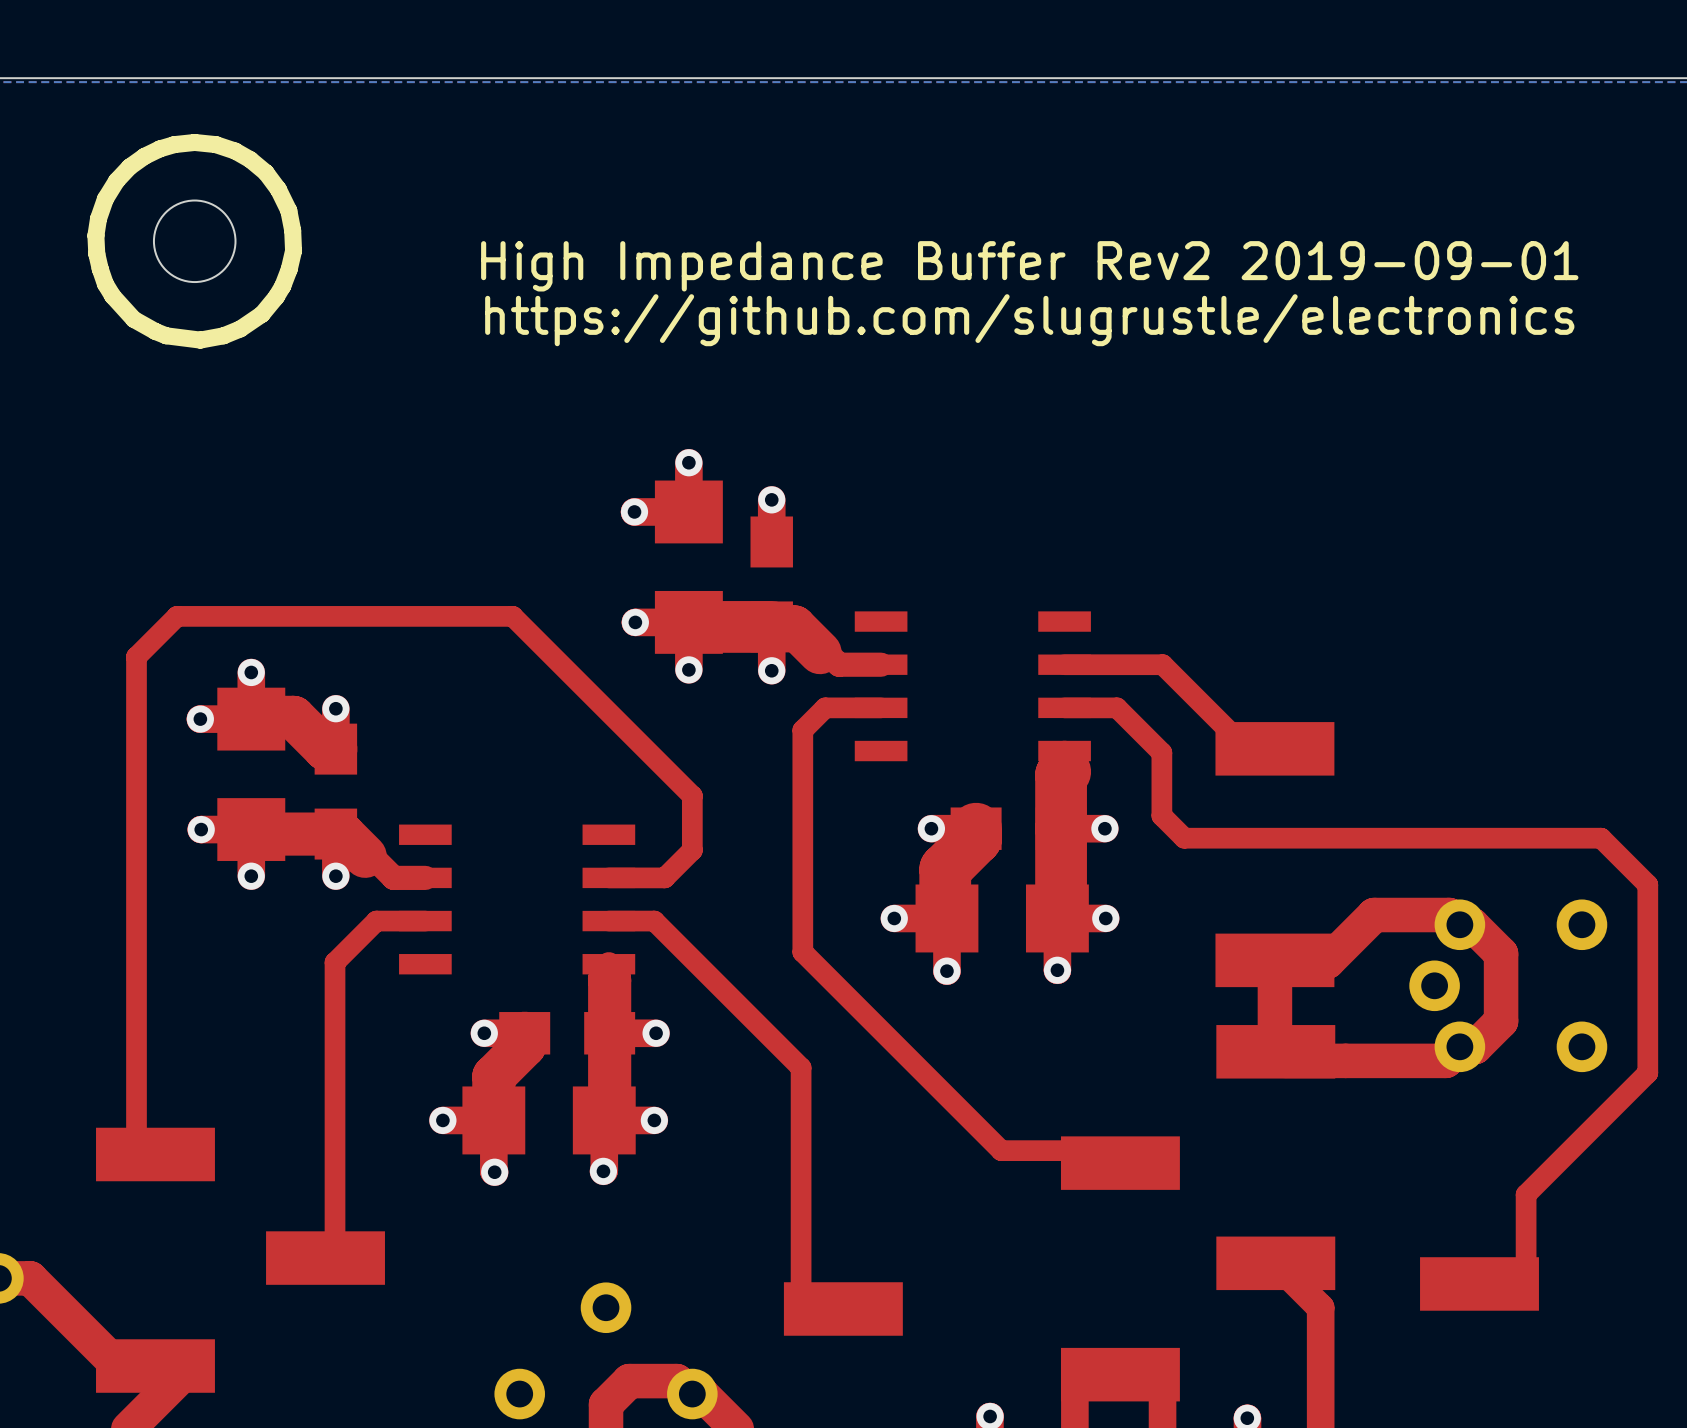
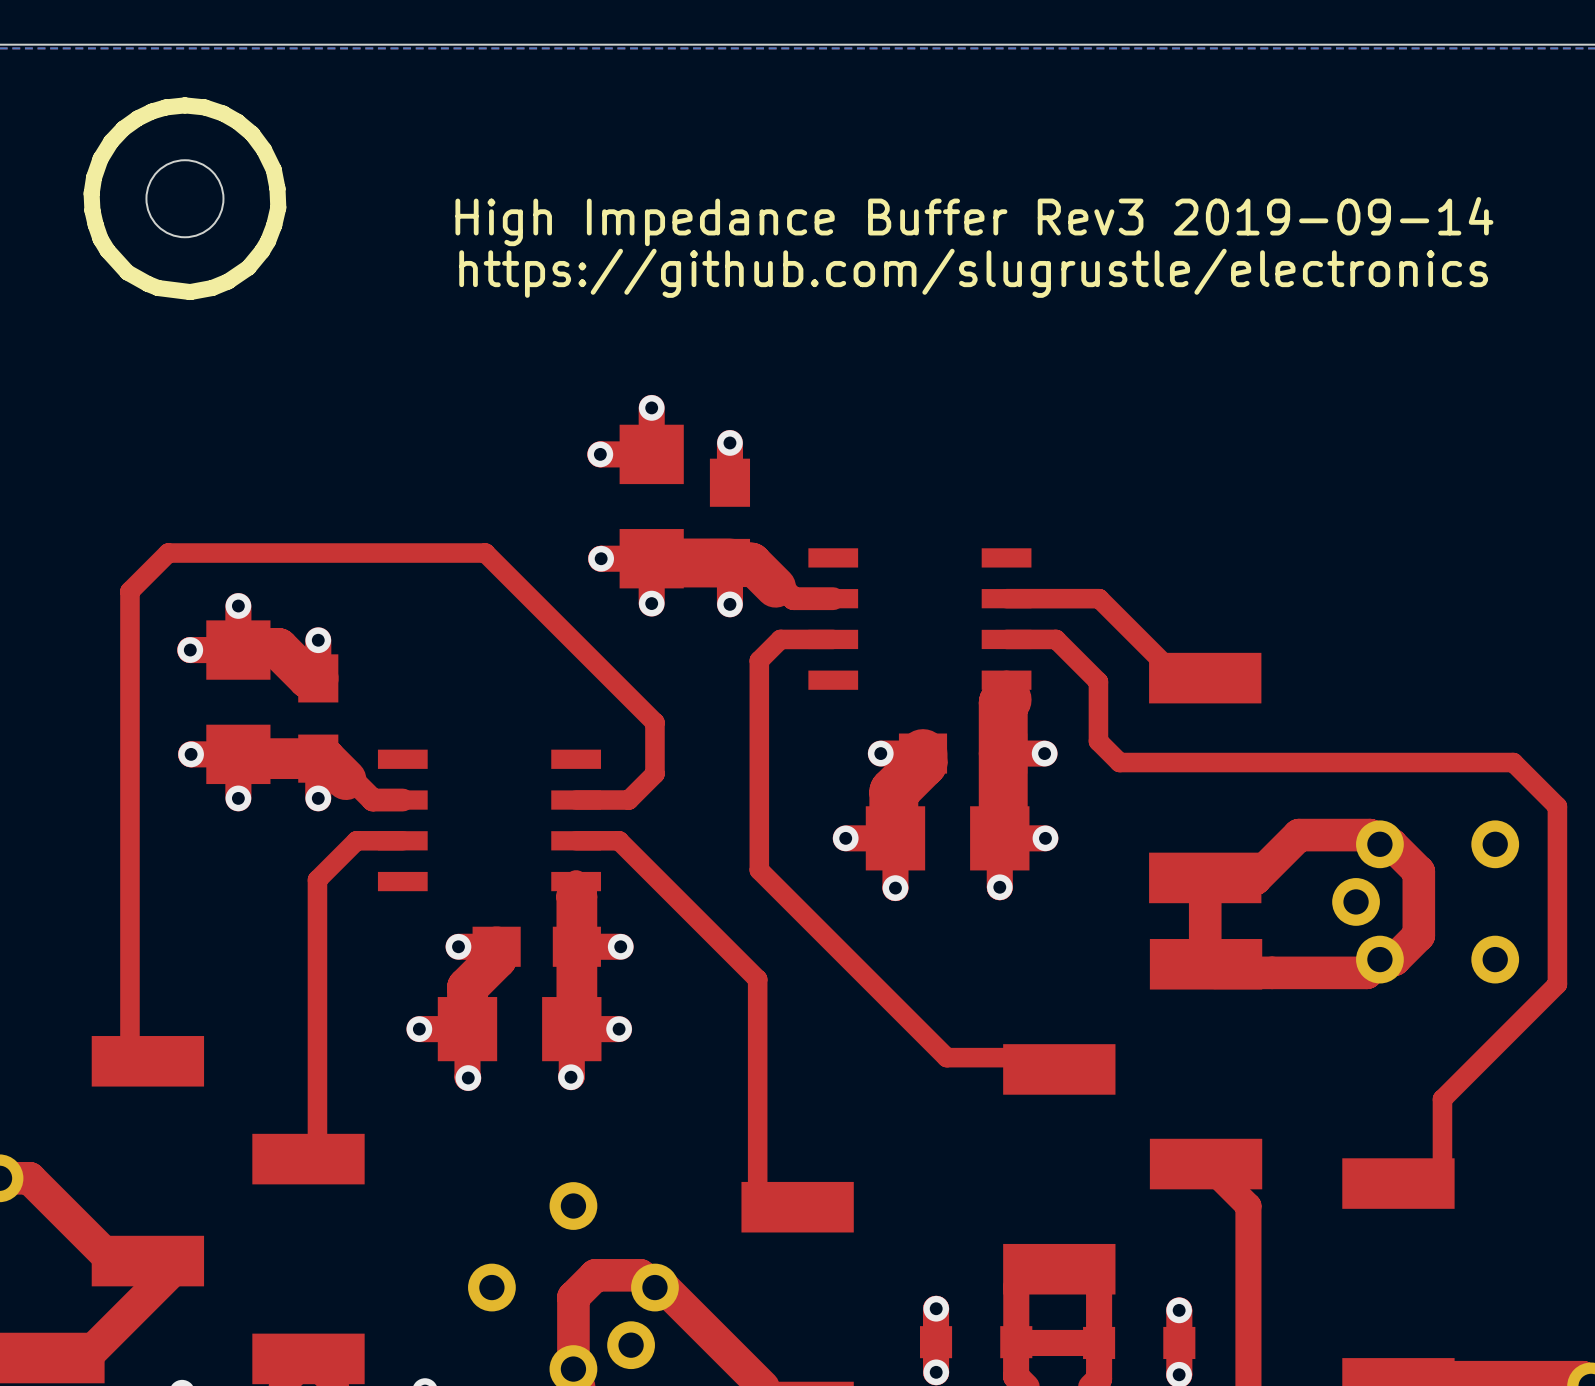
text: High Impedance Buffer Rev2 2019-09-01 (1029, 266) -> High Impedance Buffer Rev3 2019-09-14 (974, 221)

